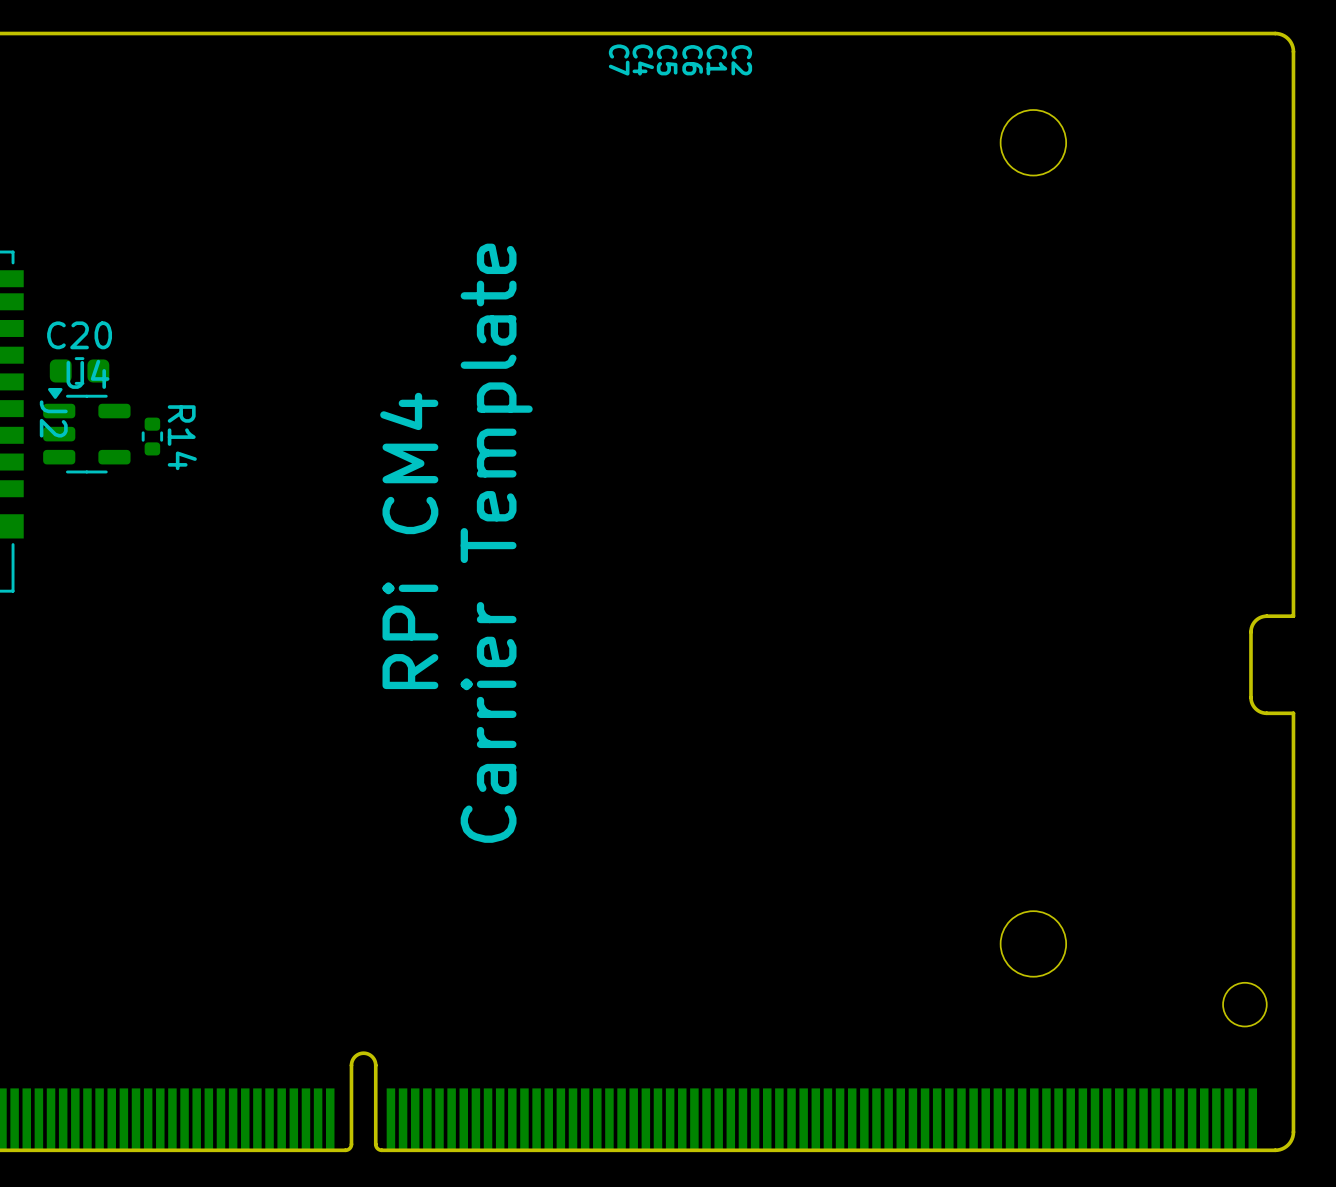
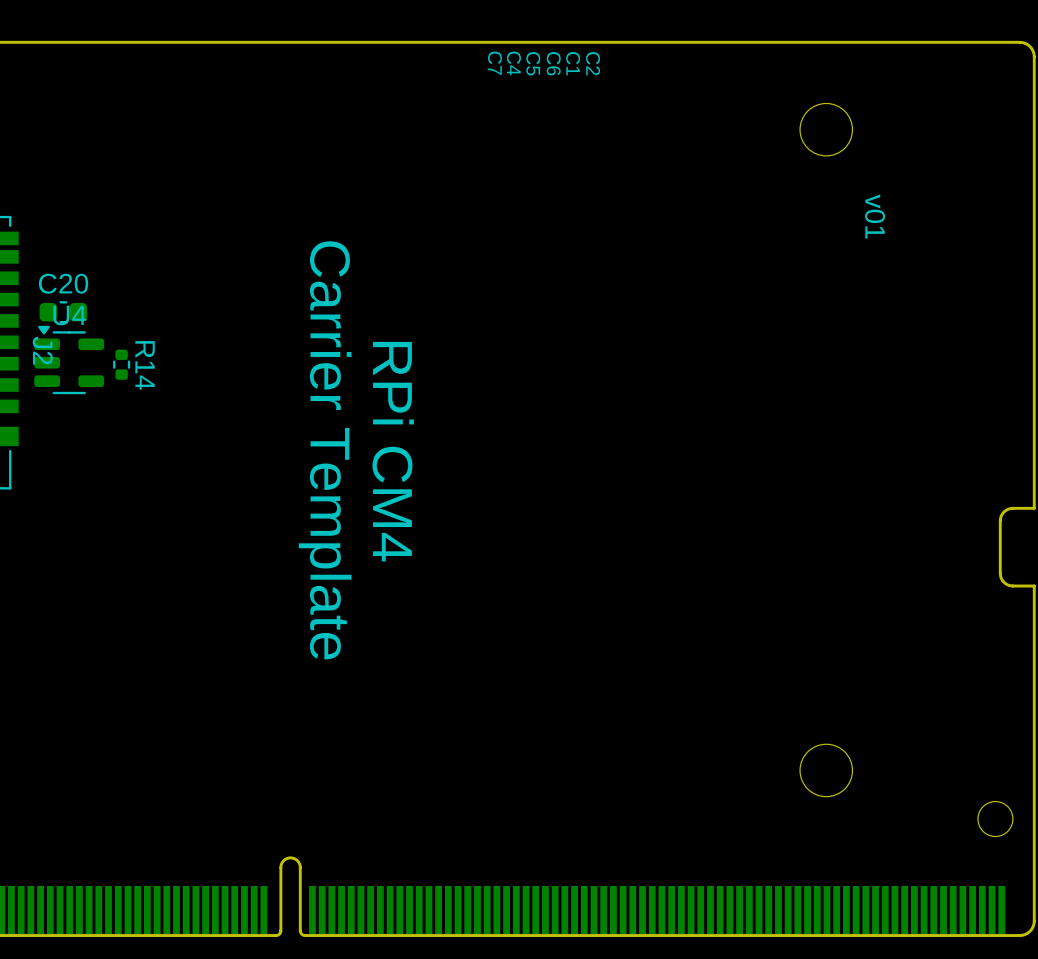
text: none -> v01 (875, 216)
text: RPi CM4 (409, 540) -> Carrier Template (325, 450)
text: Carrier Template (496, 543) -> RPi CM4 (393, 451)

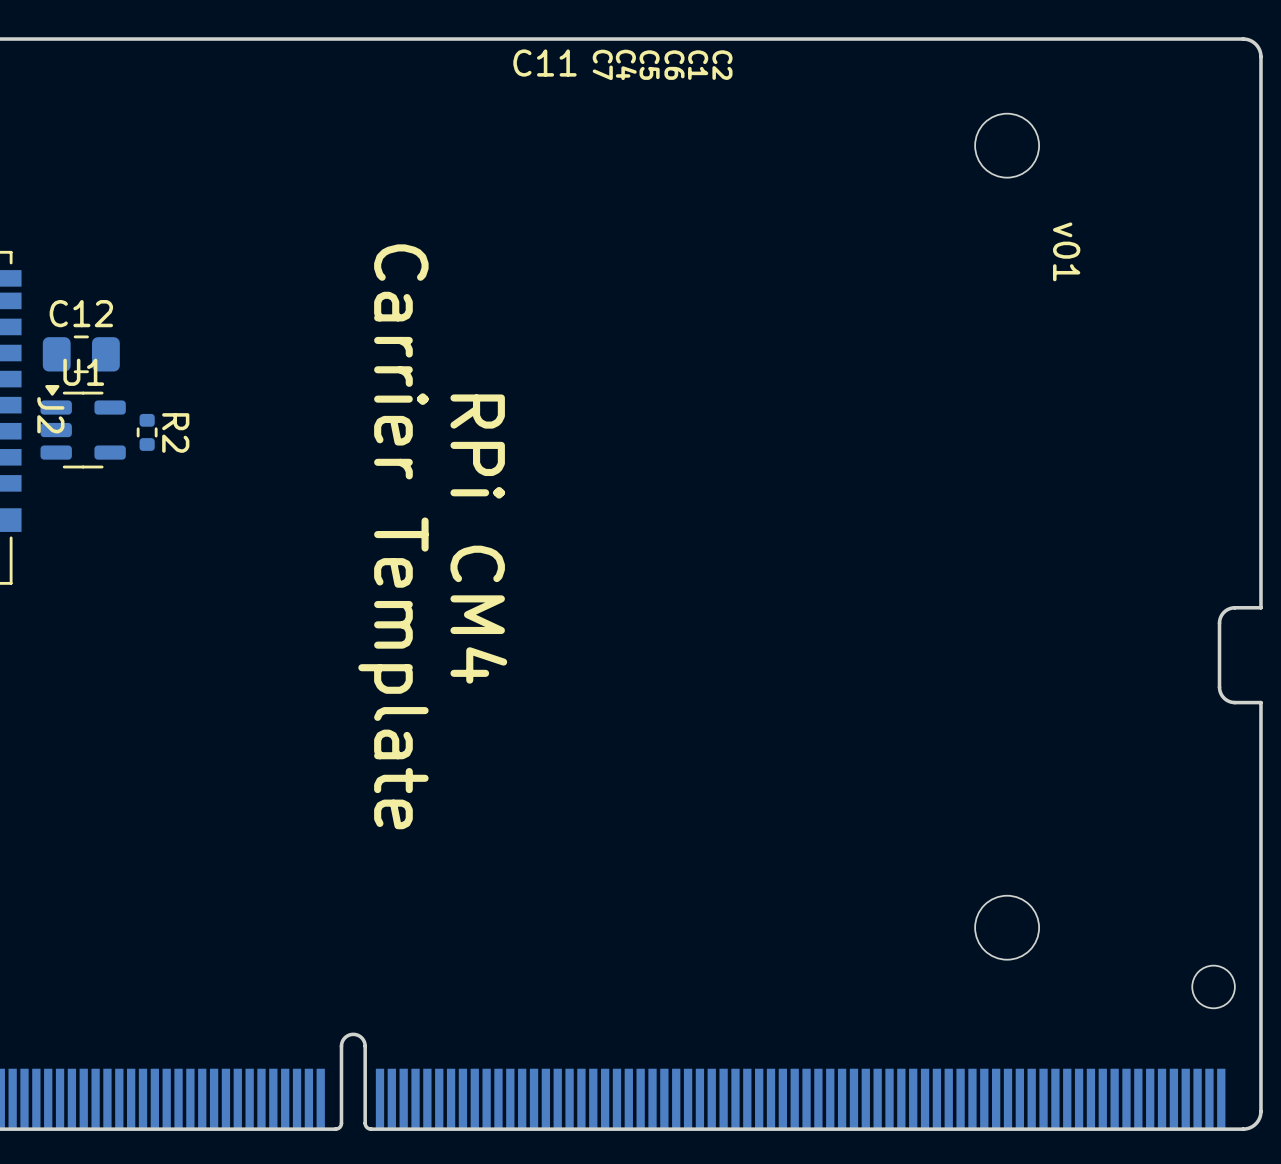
C11: none -> (544, 63)
C12: none -> (81, 354)
C20: (63, 312) -> none
U4 name: U4 (69, 315) -> U1 (83, 372)
R14 name: R14 (145, 365) -> R2 (175, 432)

